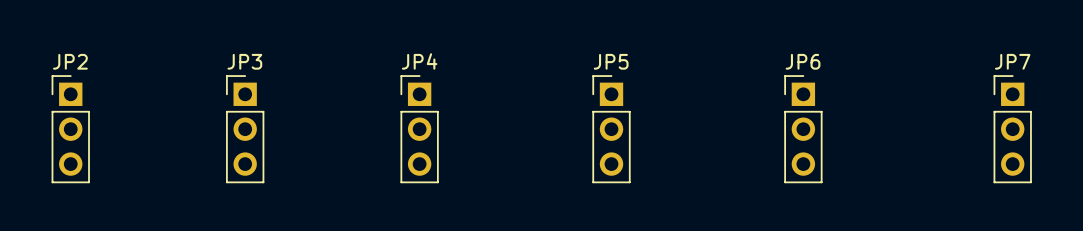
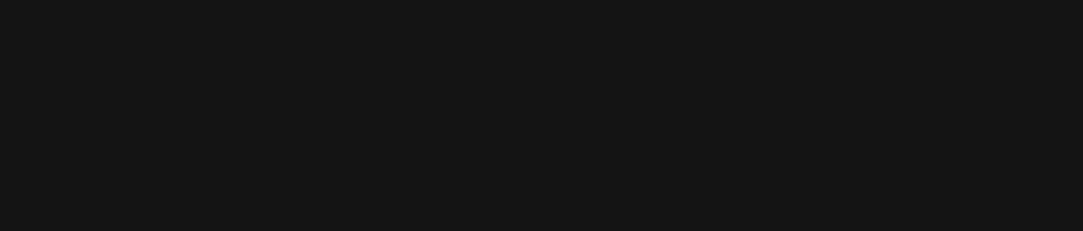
JP2: (70, 129) -> none
JP3: (245, 129) -> none
JP4: (419, 129) -> none
JP5: (611, 129) -> none
JP6: (803, 129) -> none
JP7: (1012, 129) -> none

